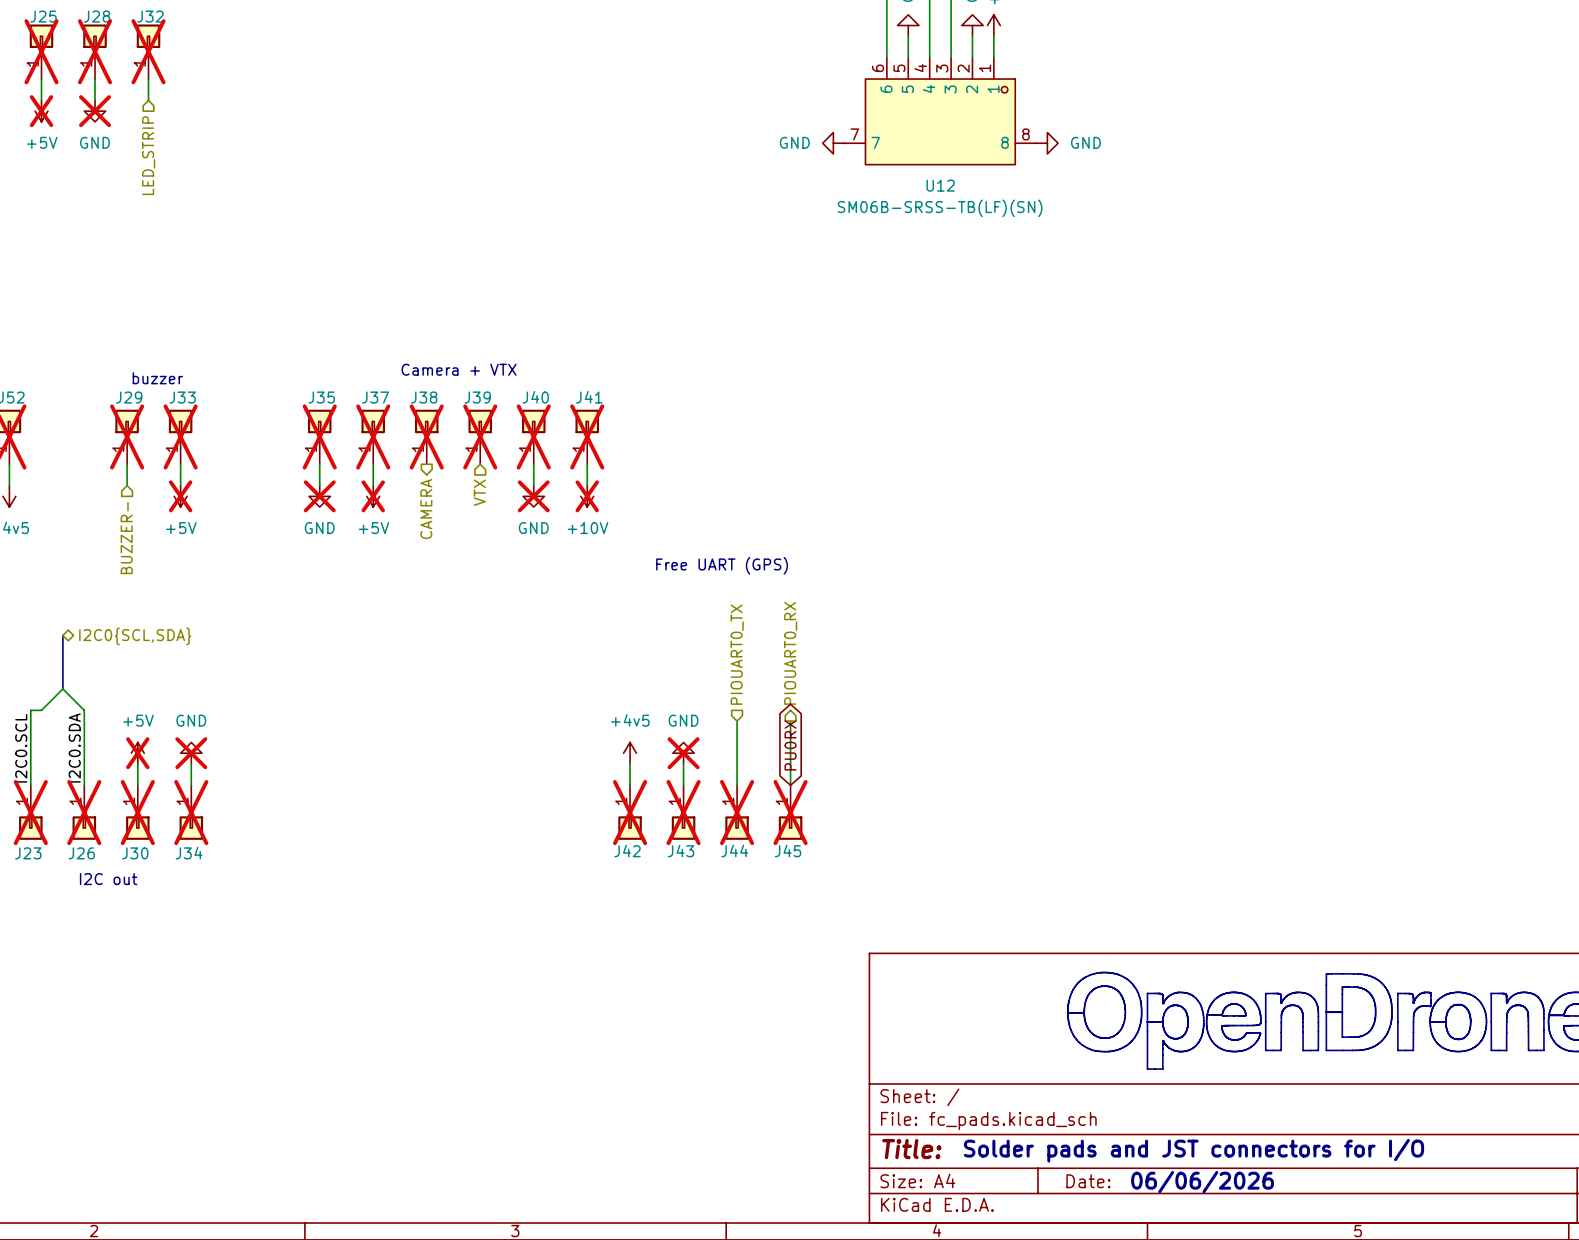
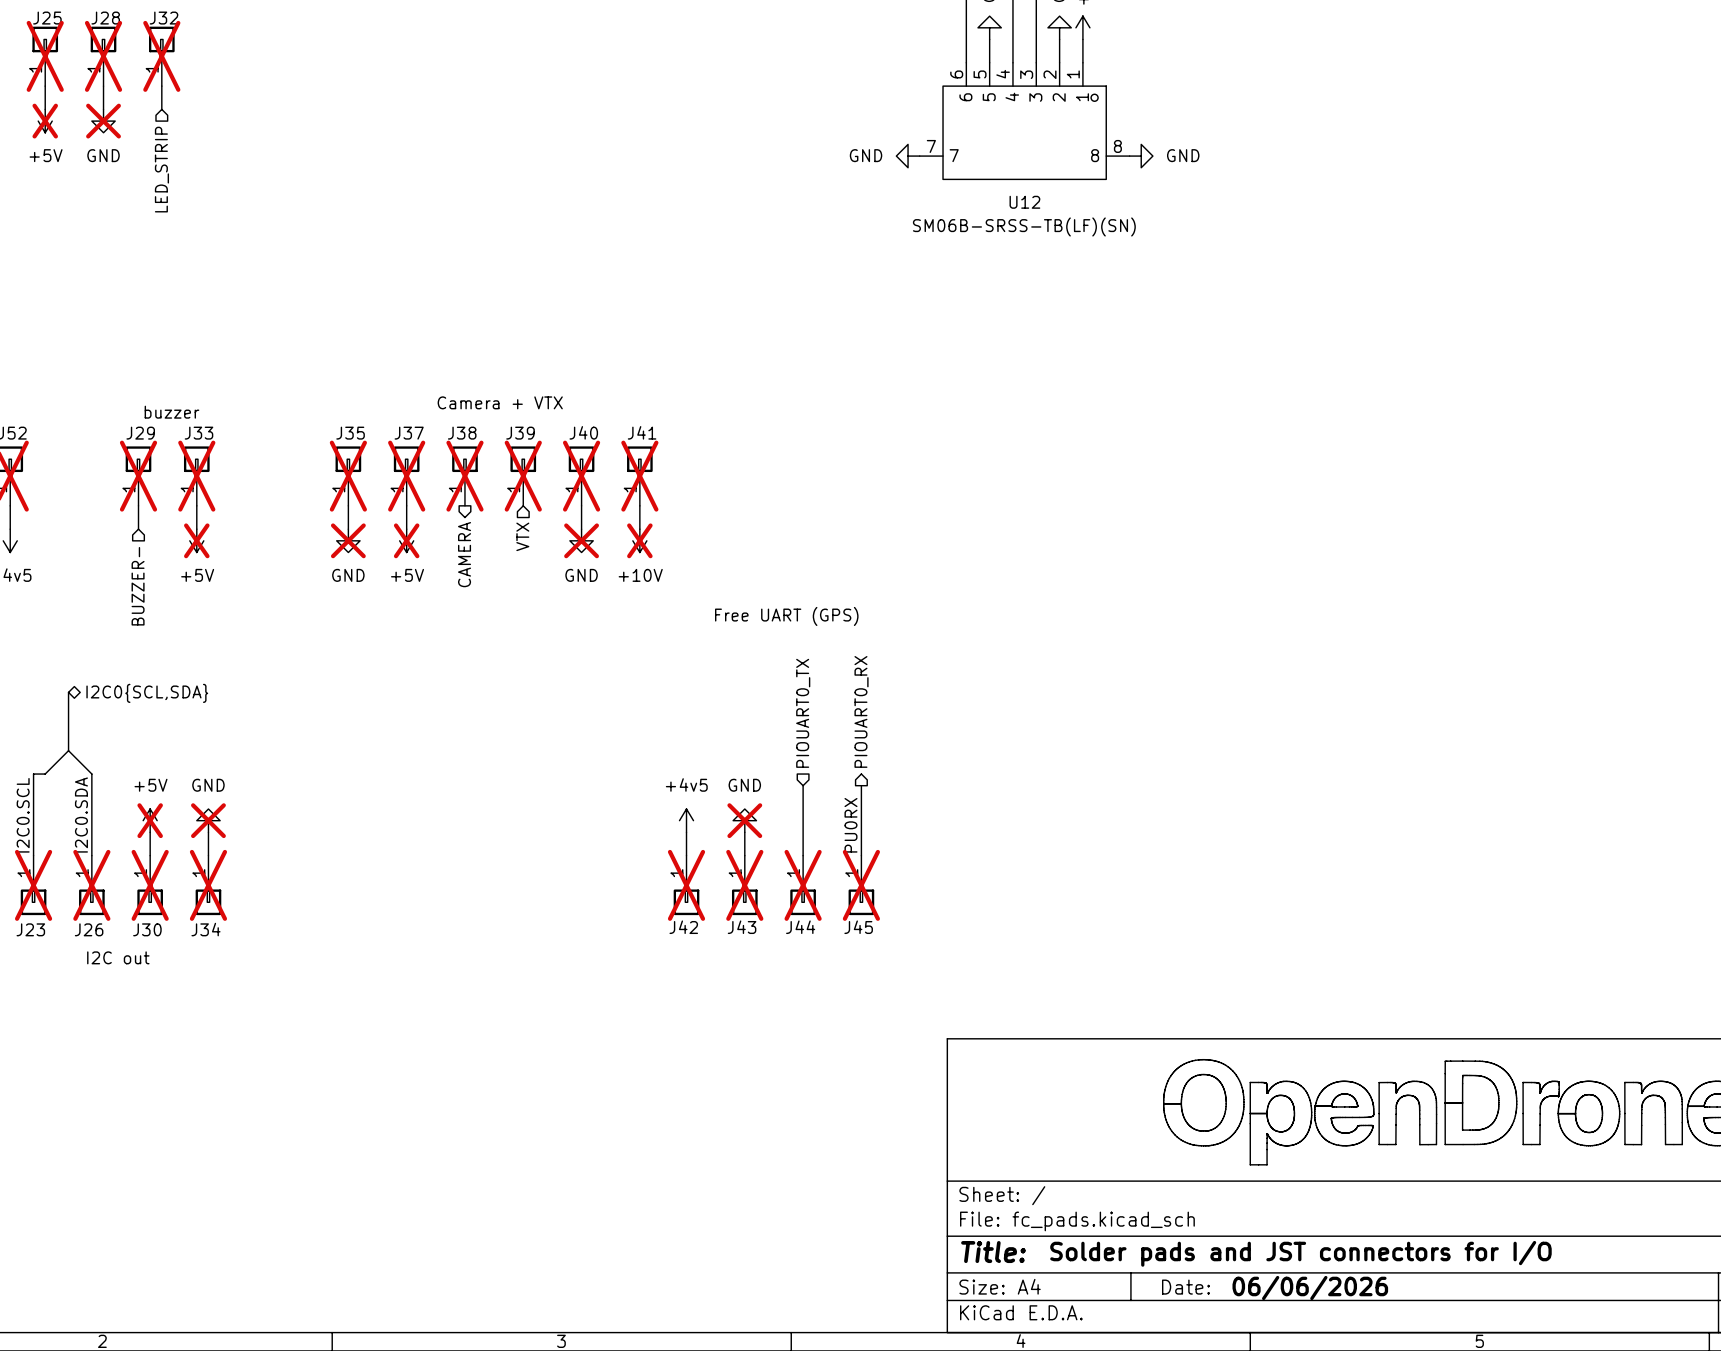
global label: PU0RX (790, 745) -> none
label: none -> PU0RX (850, 825)

